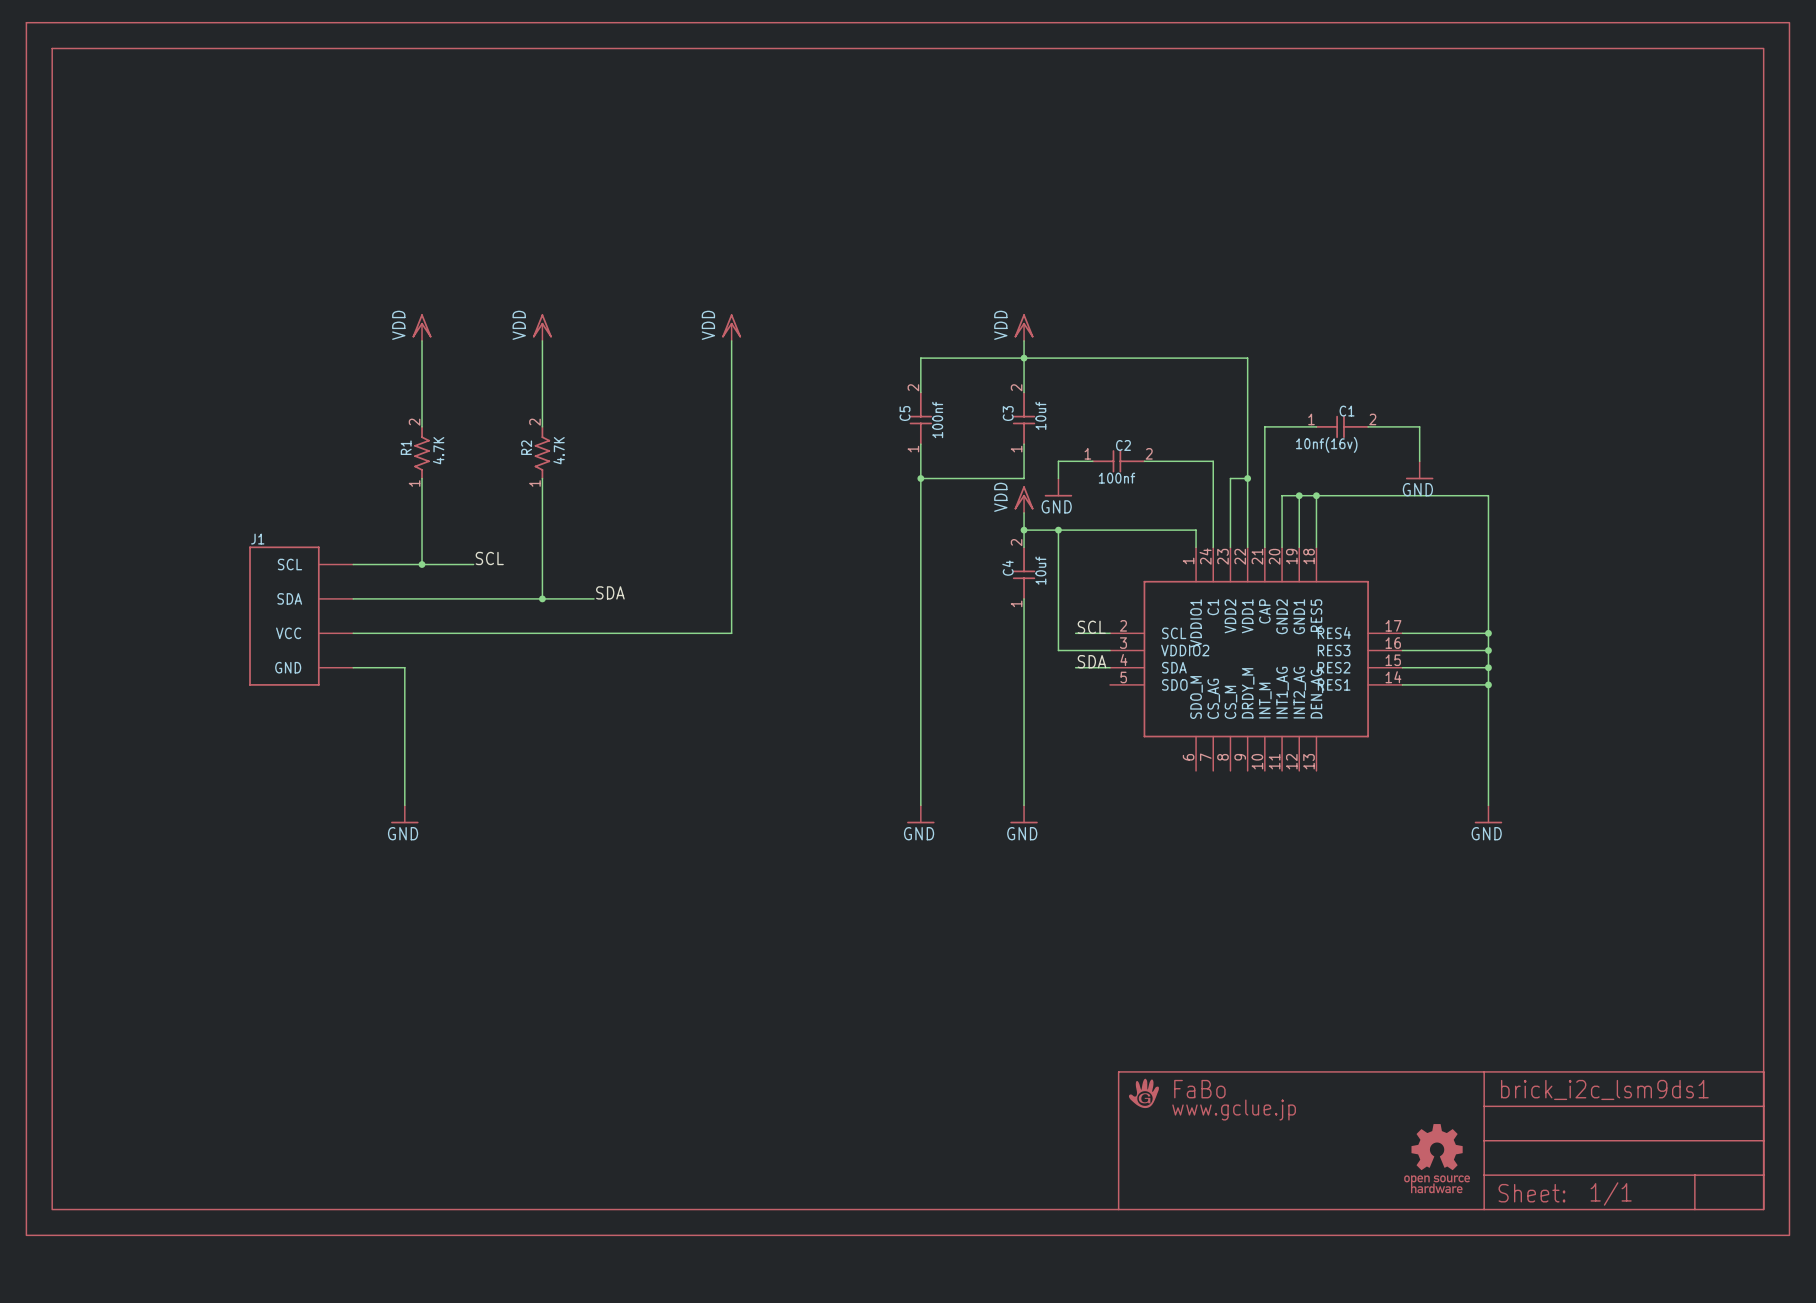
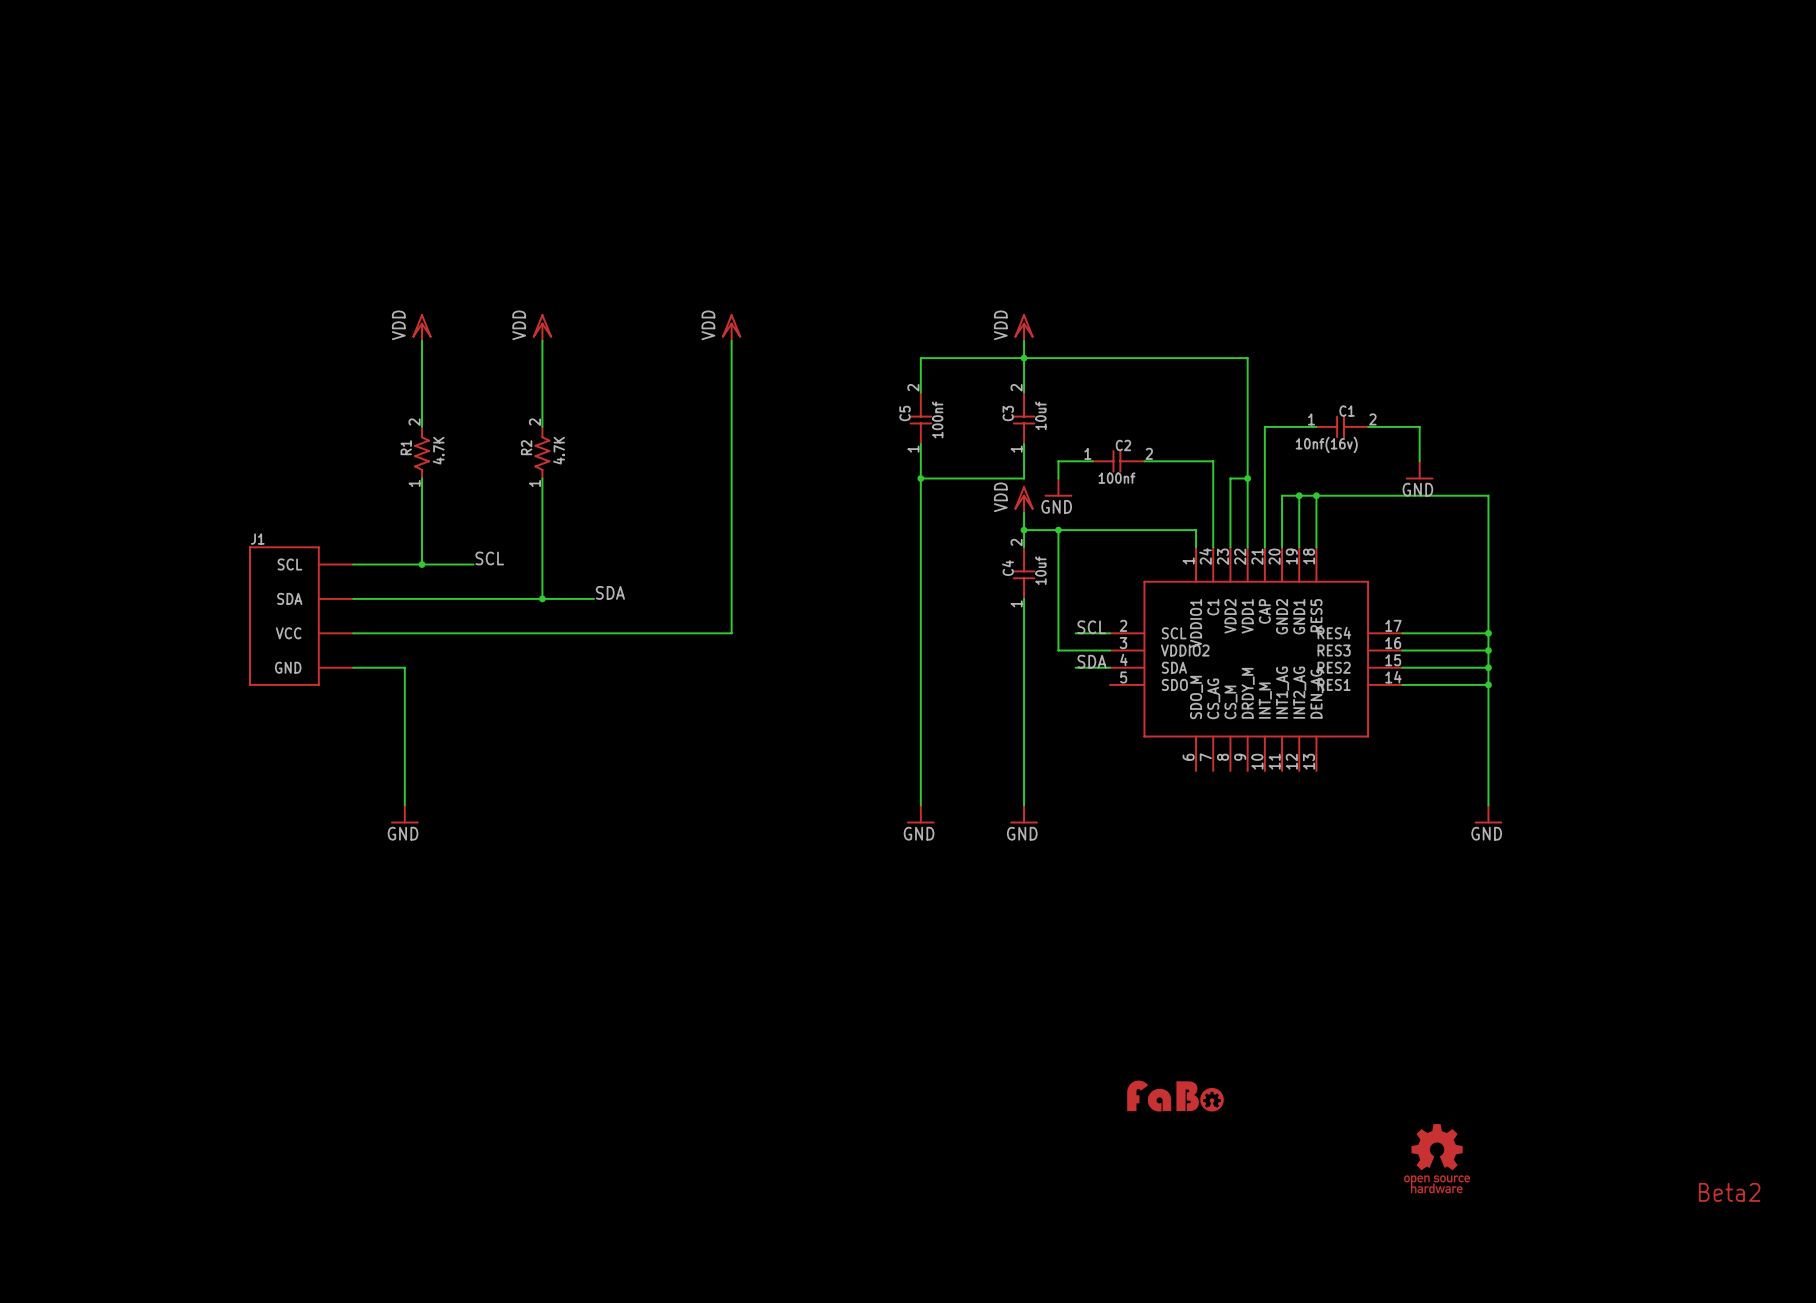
part: (907, 629) -> none
part: none -> (1175, 1096)
text: none -> Beta2 (1729, 1192)

